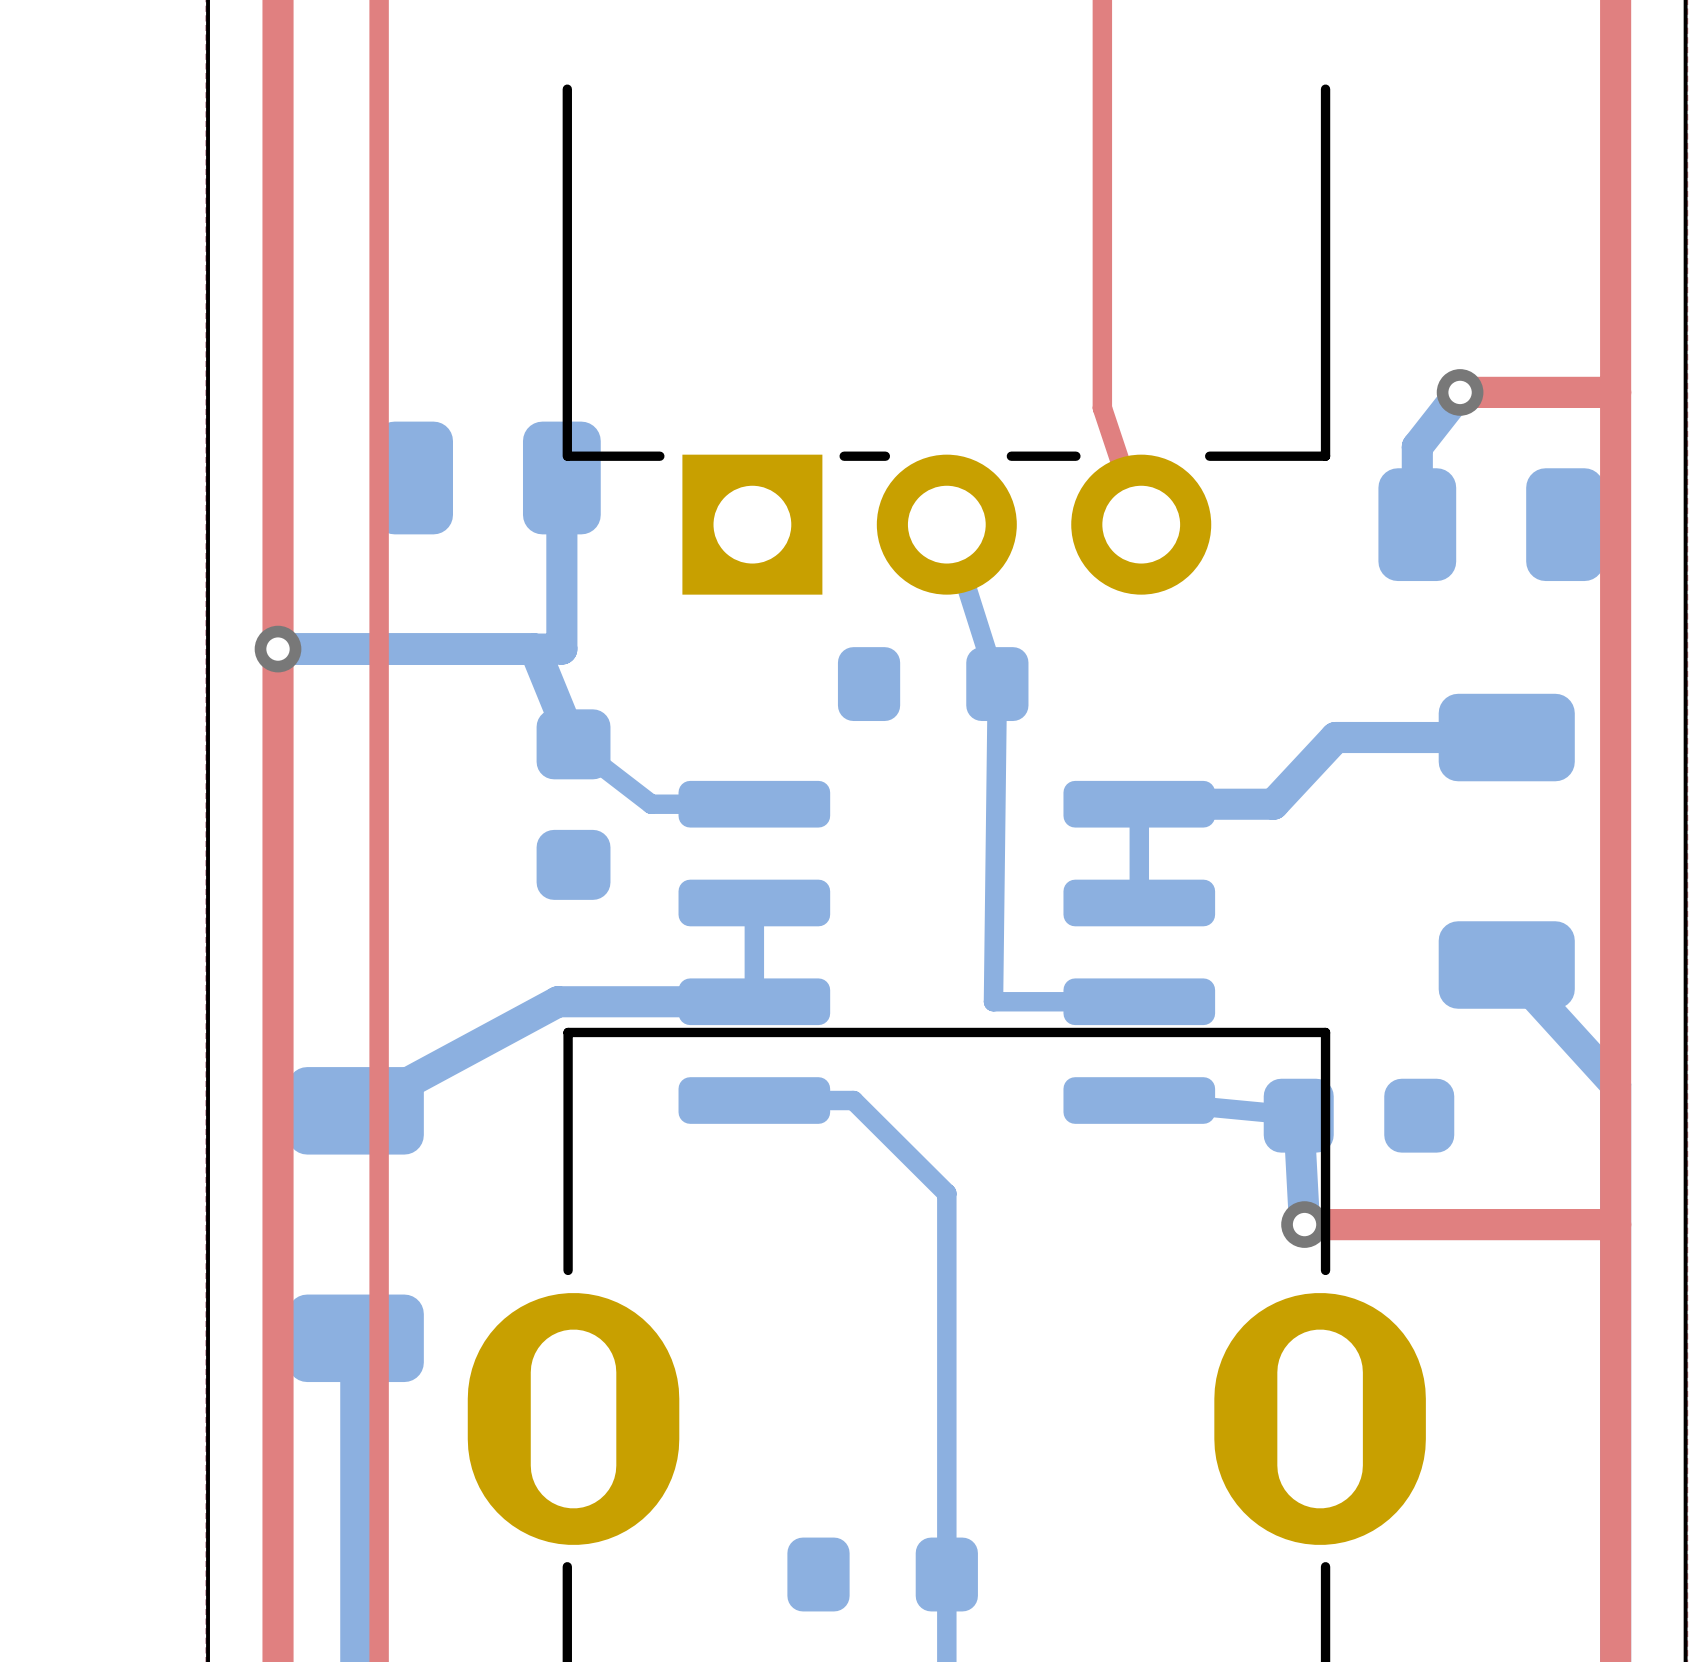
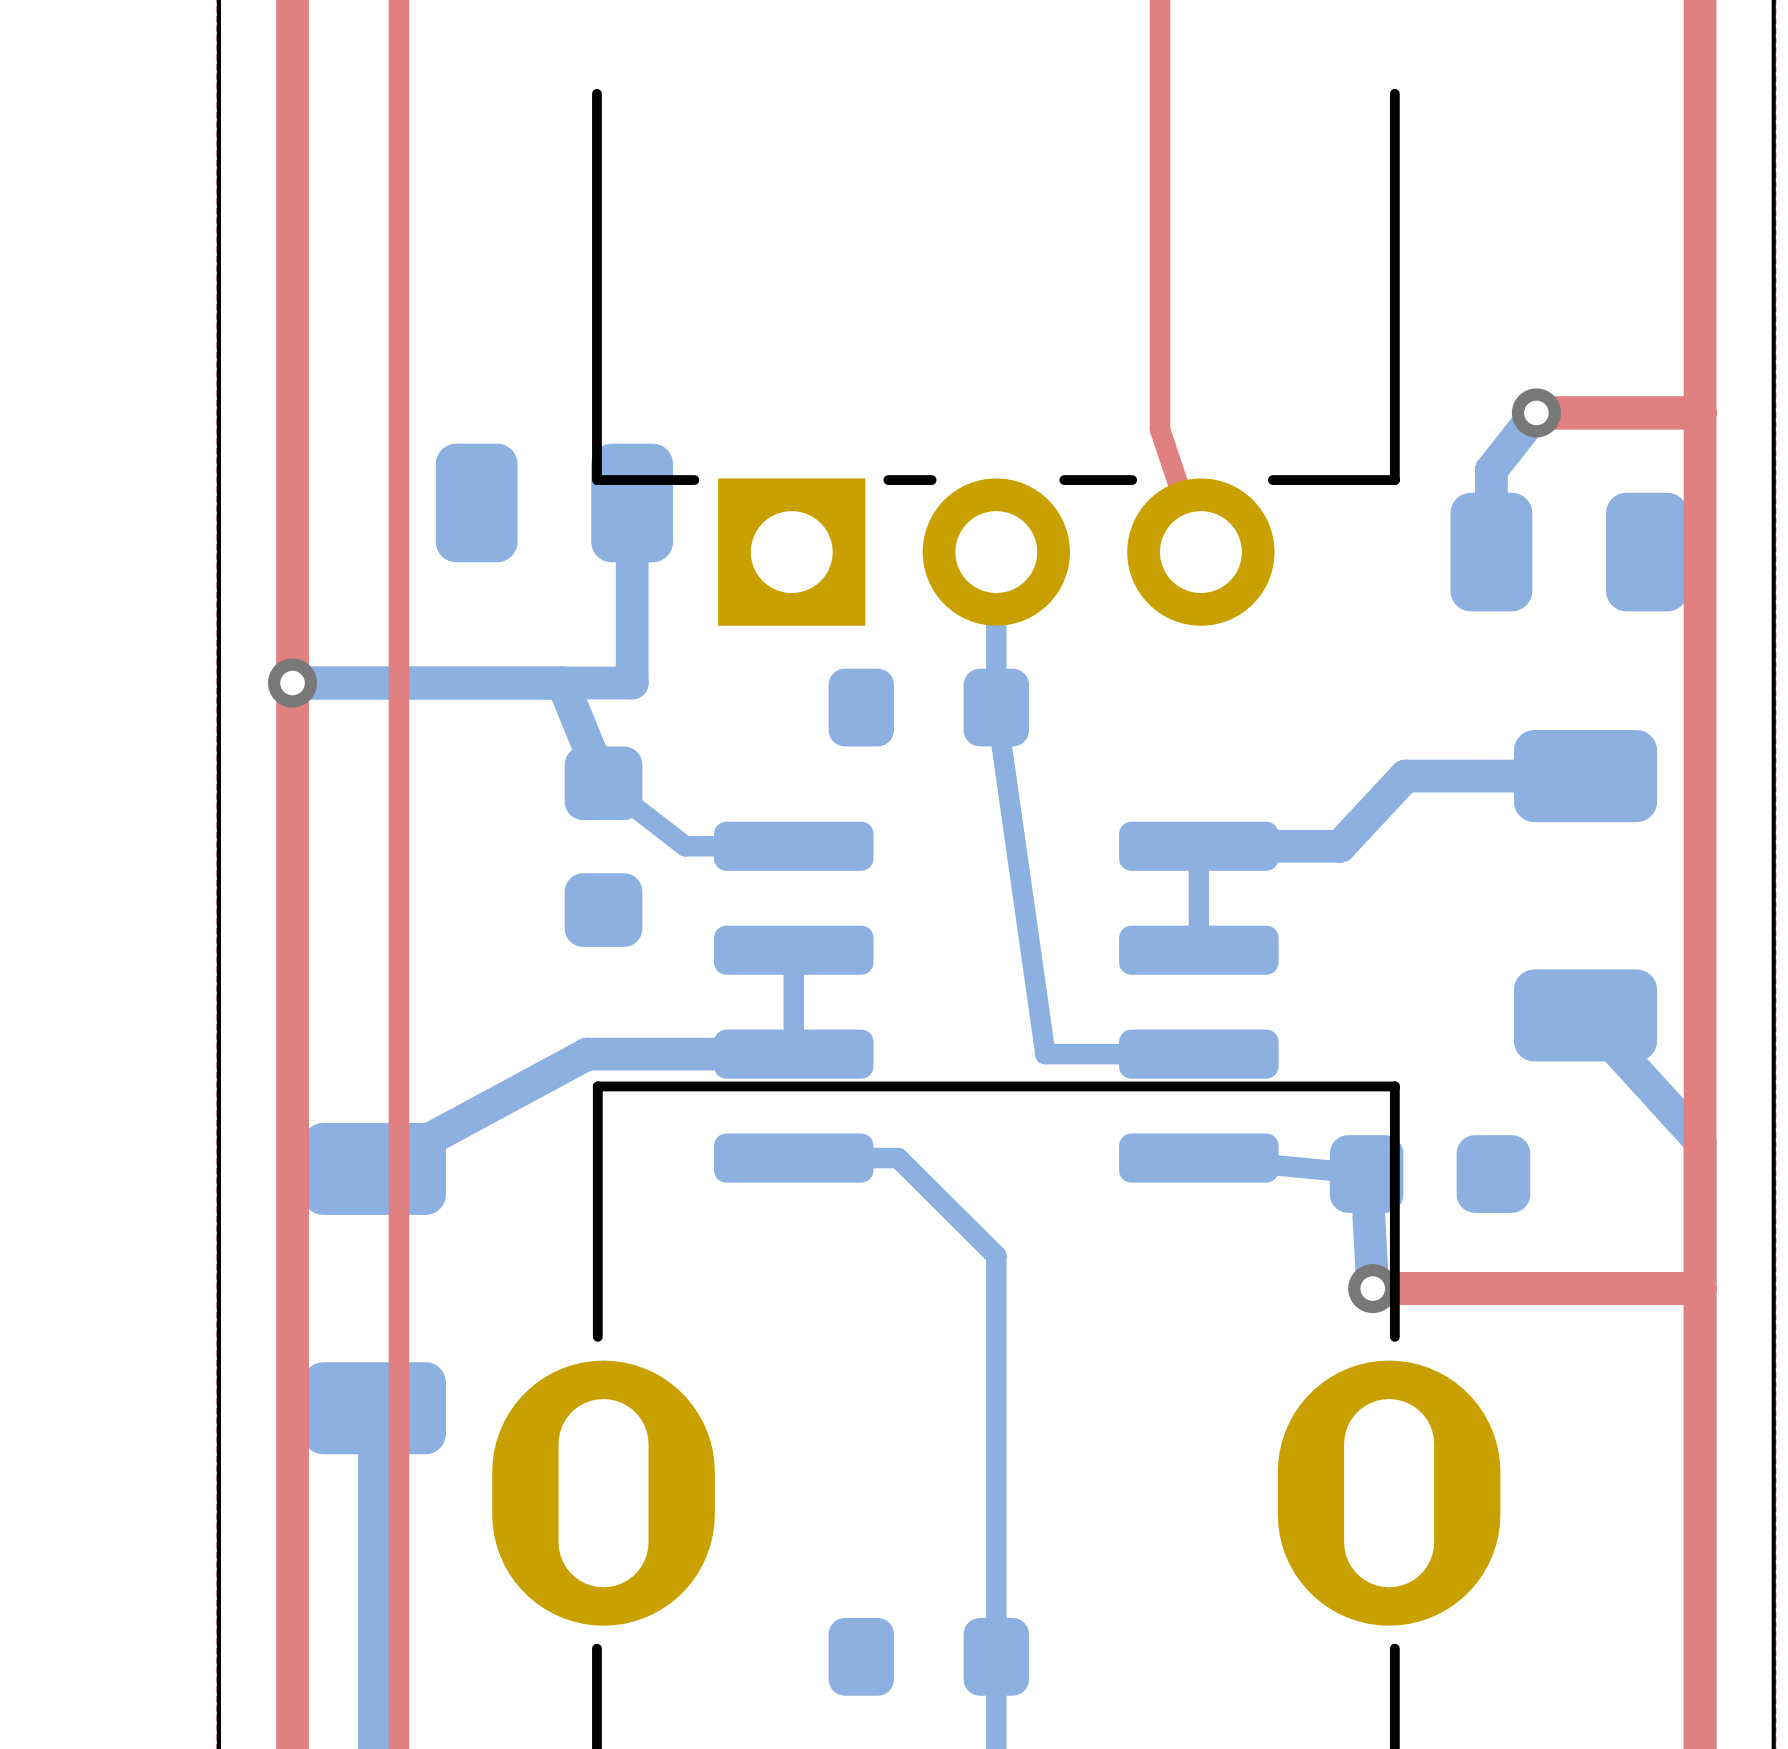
part position: (487, 477) -> (554, 502)
bottom track: (561, 477) (561, 649) -> (632, 502) (632, 683) (591, 683)
bottom track: (946, 524) (997, 684) (993, 1001) -> (996, 552) (996, 707) (1045, 1054)
part position: (933, 684) -> (928, 707)

